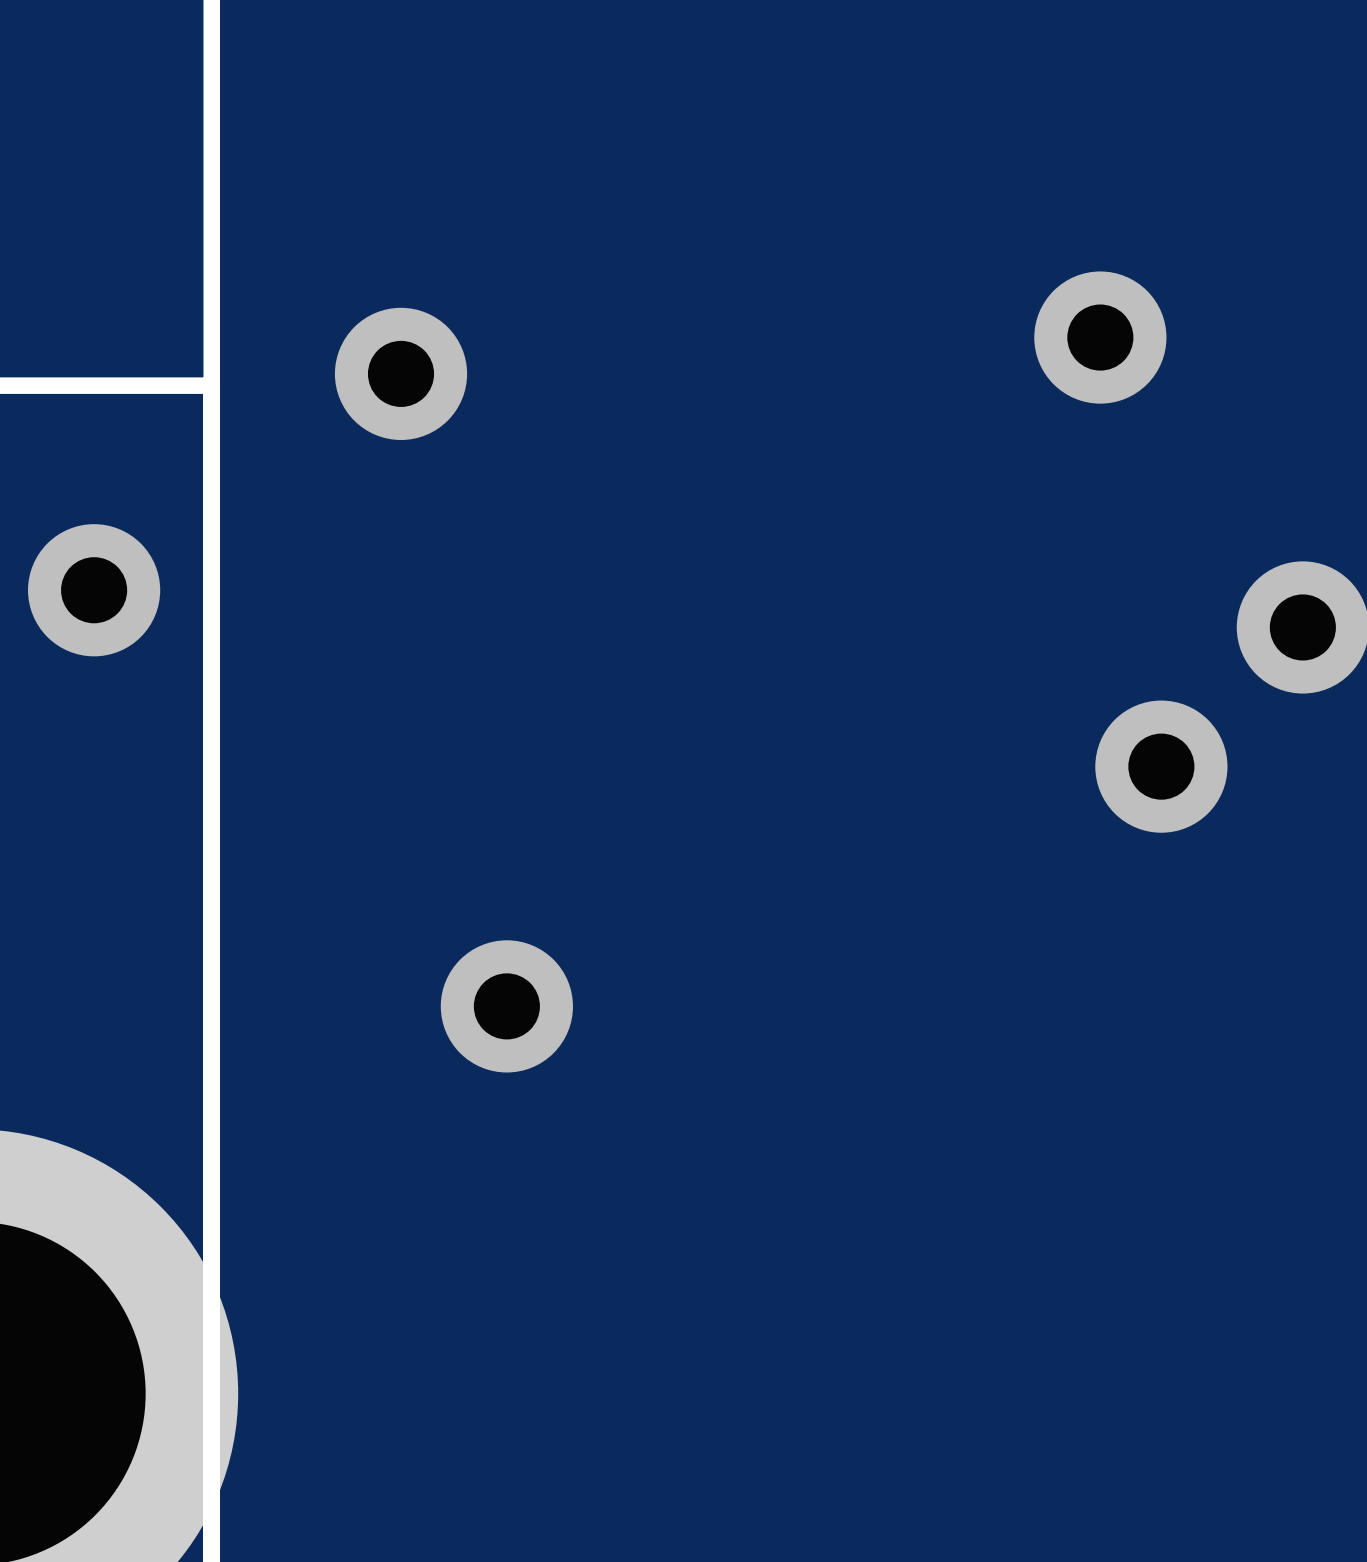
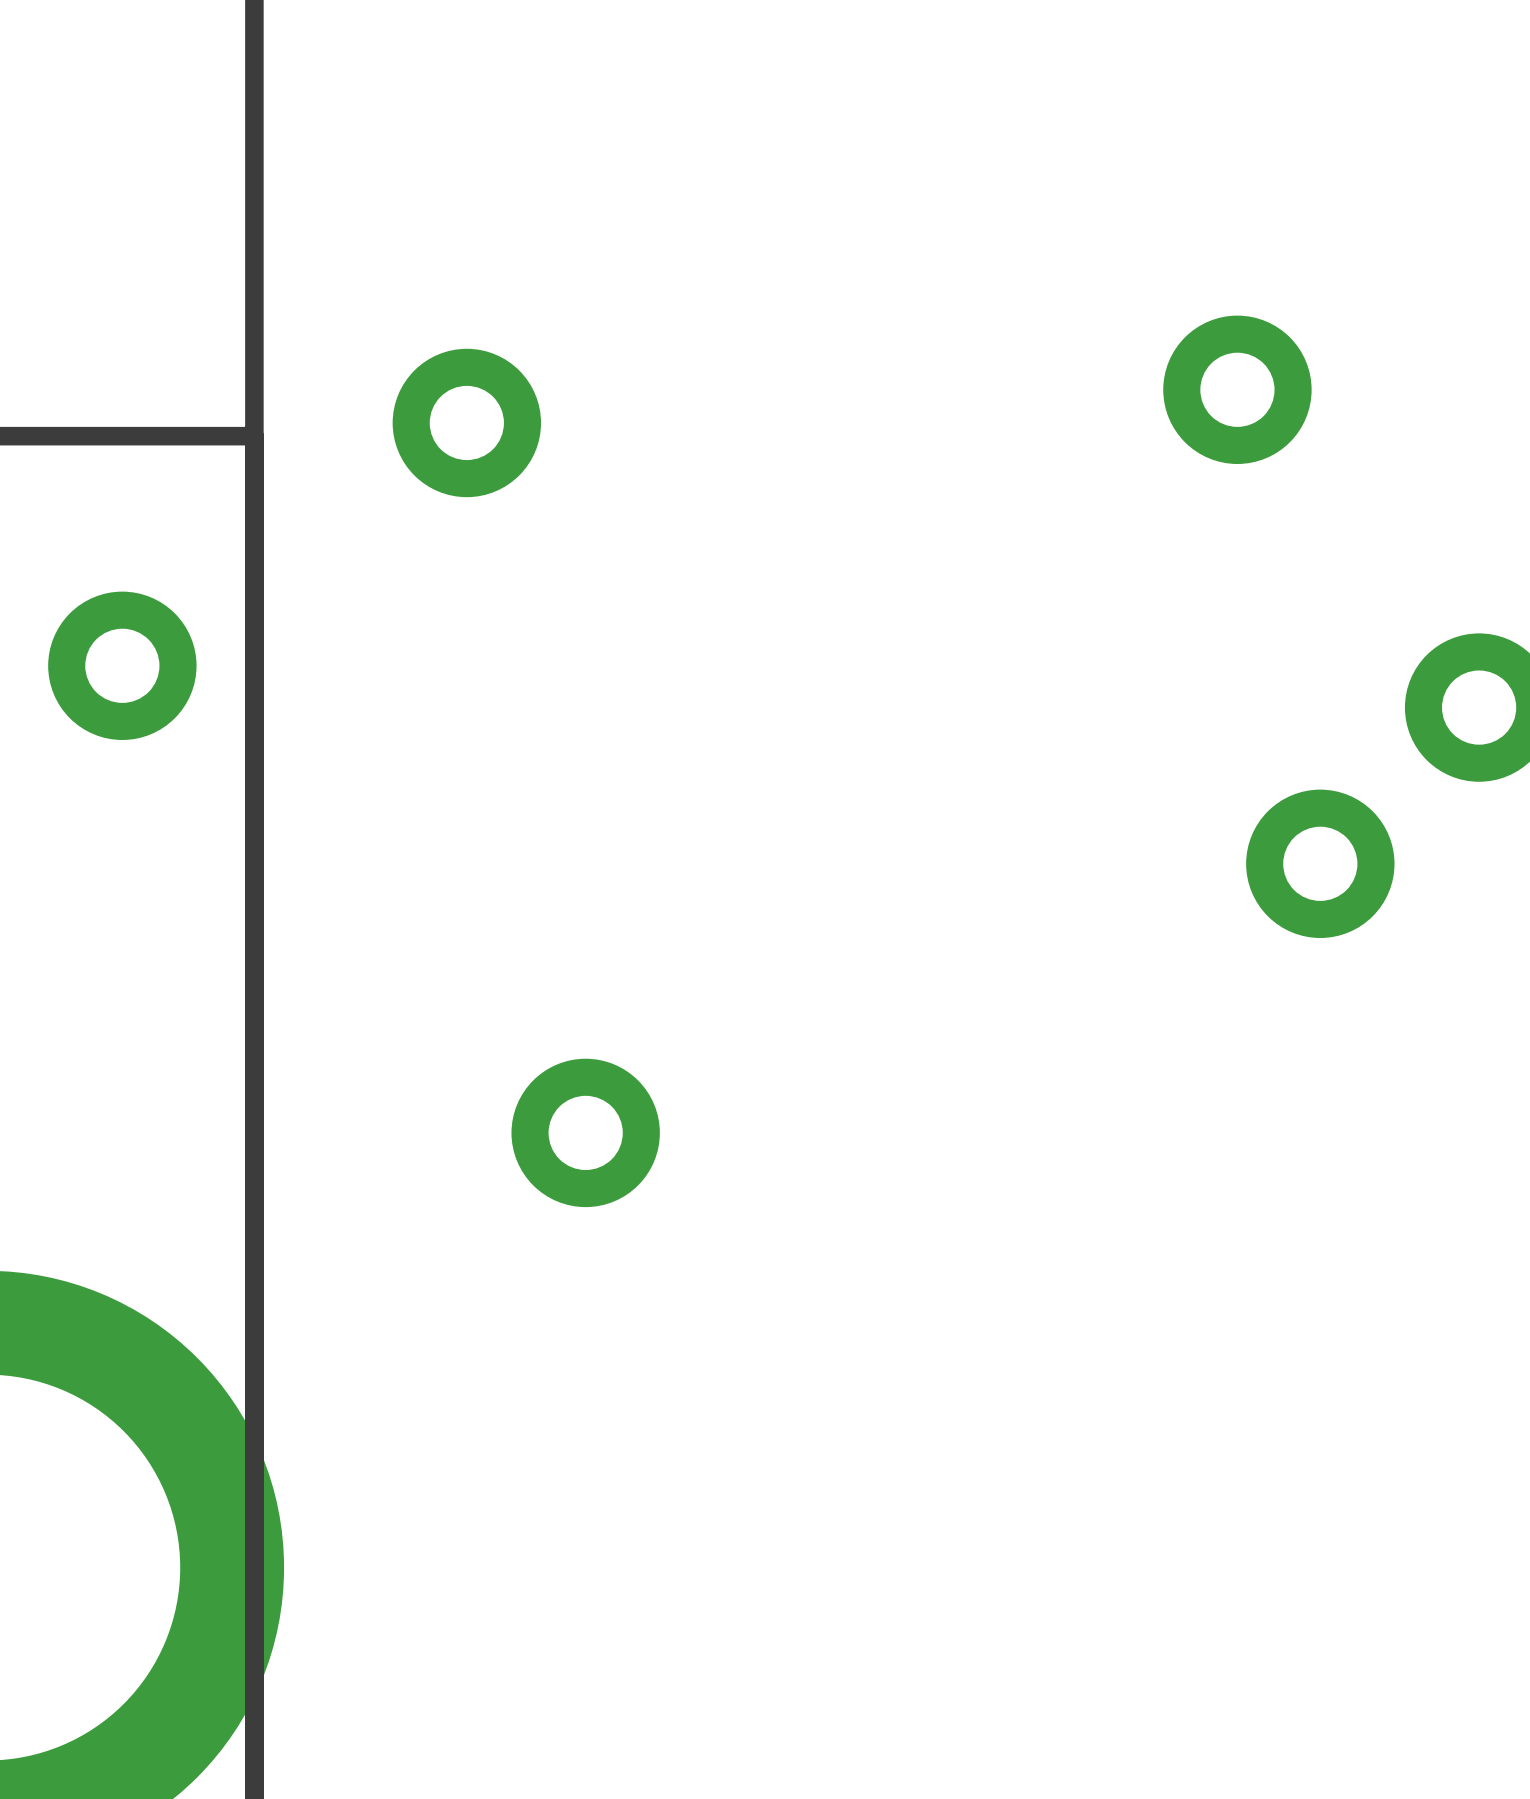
via position: (1100, 337) -> (1237, 389)

